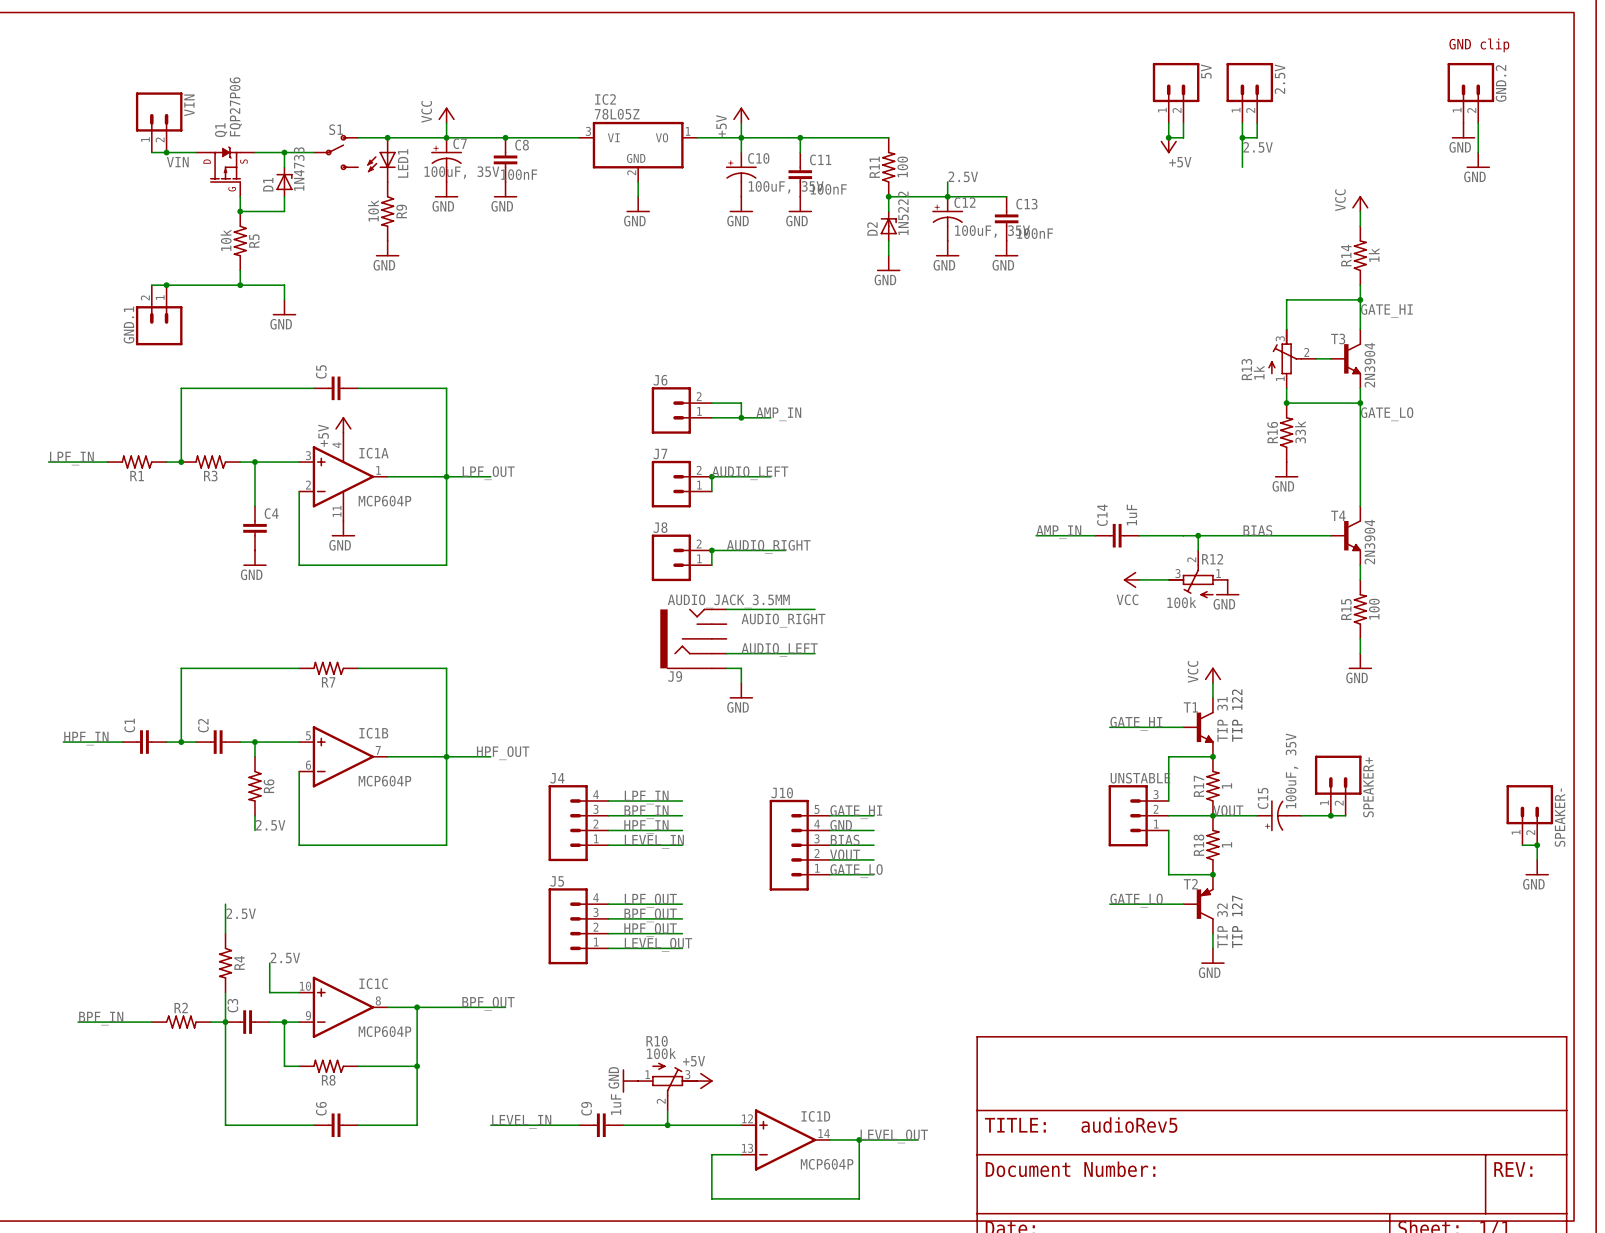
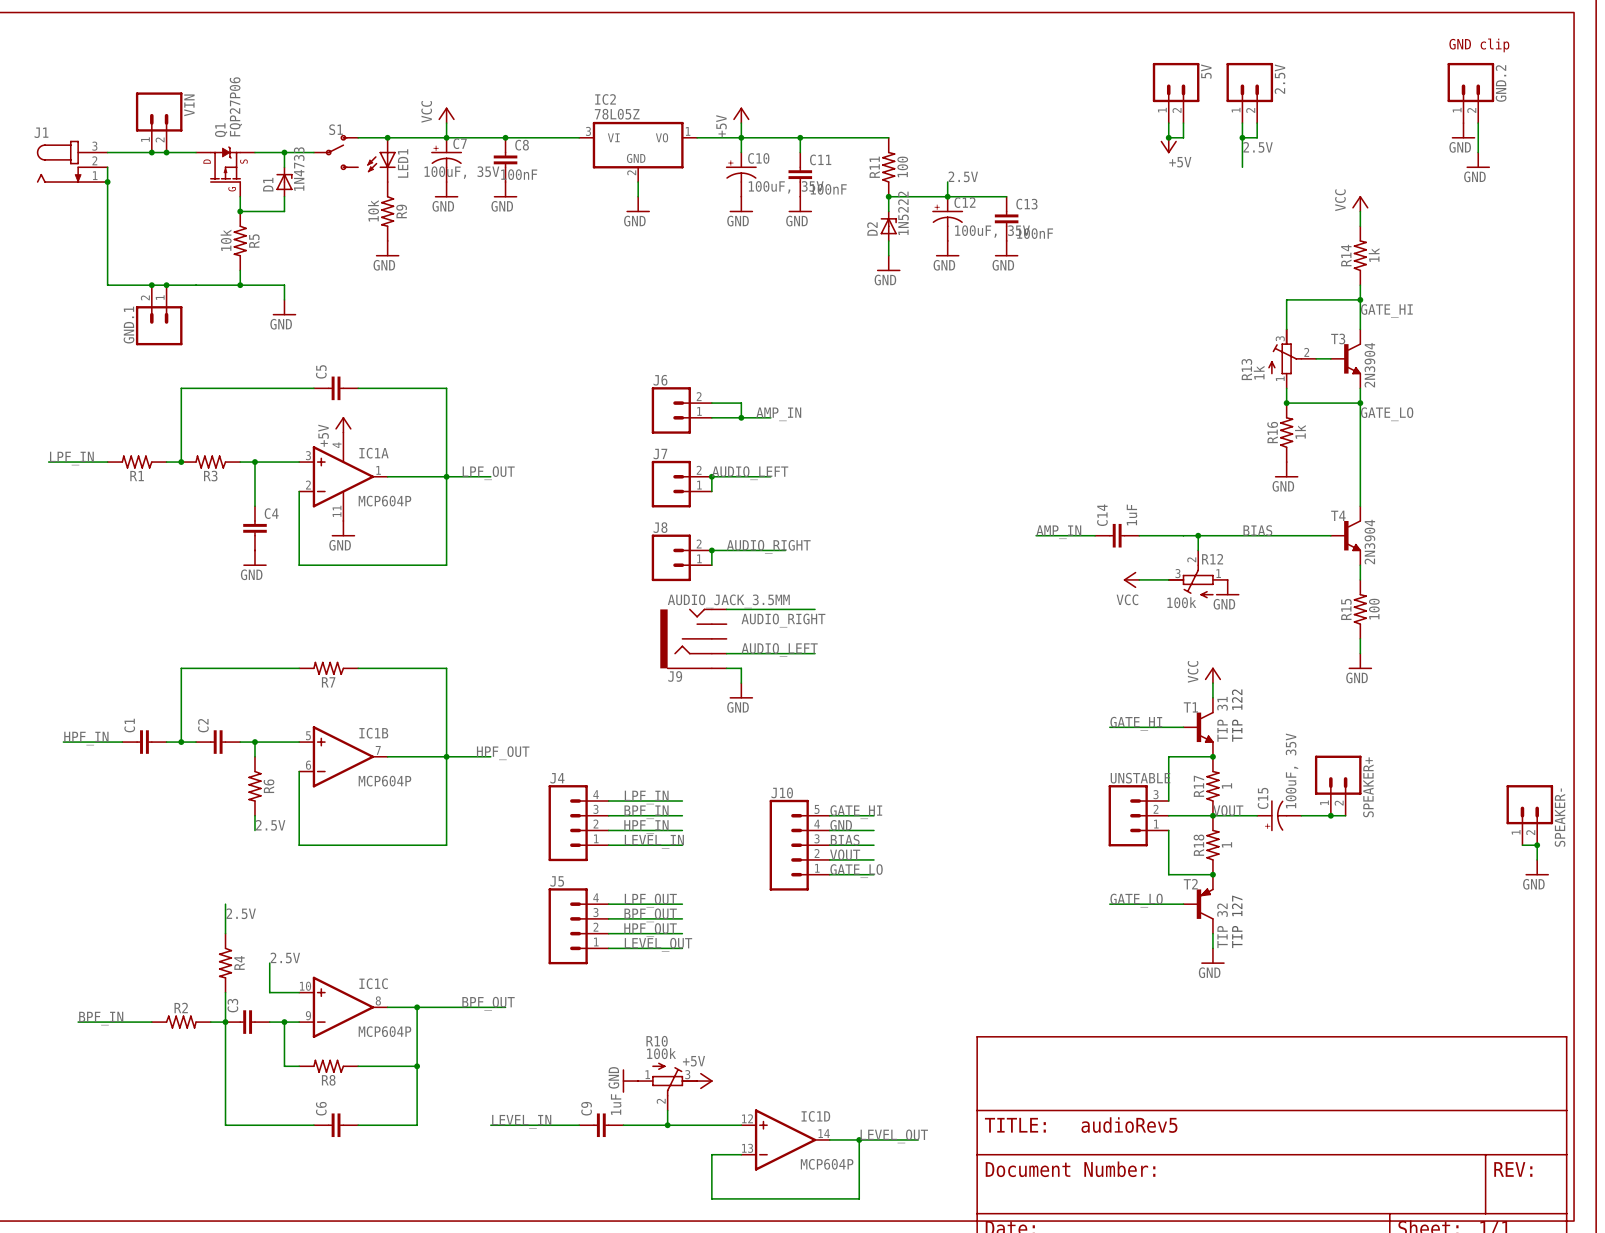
wire: none -> (107, 152) (151, 152)
junction: none -> (151, 152)
J1: none -> (72, 161)
label: VIN (177, 162) -> none
wire: none -> (107, 167) (107, 285) (151, 285)
junction: none -> (107, 182)
junction: none -> (151, 285)
R16 value: 33k (1300, 432) -> 1k (1300, 431)

